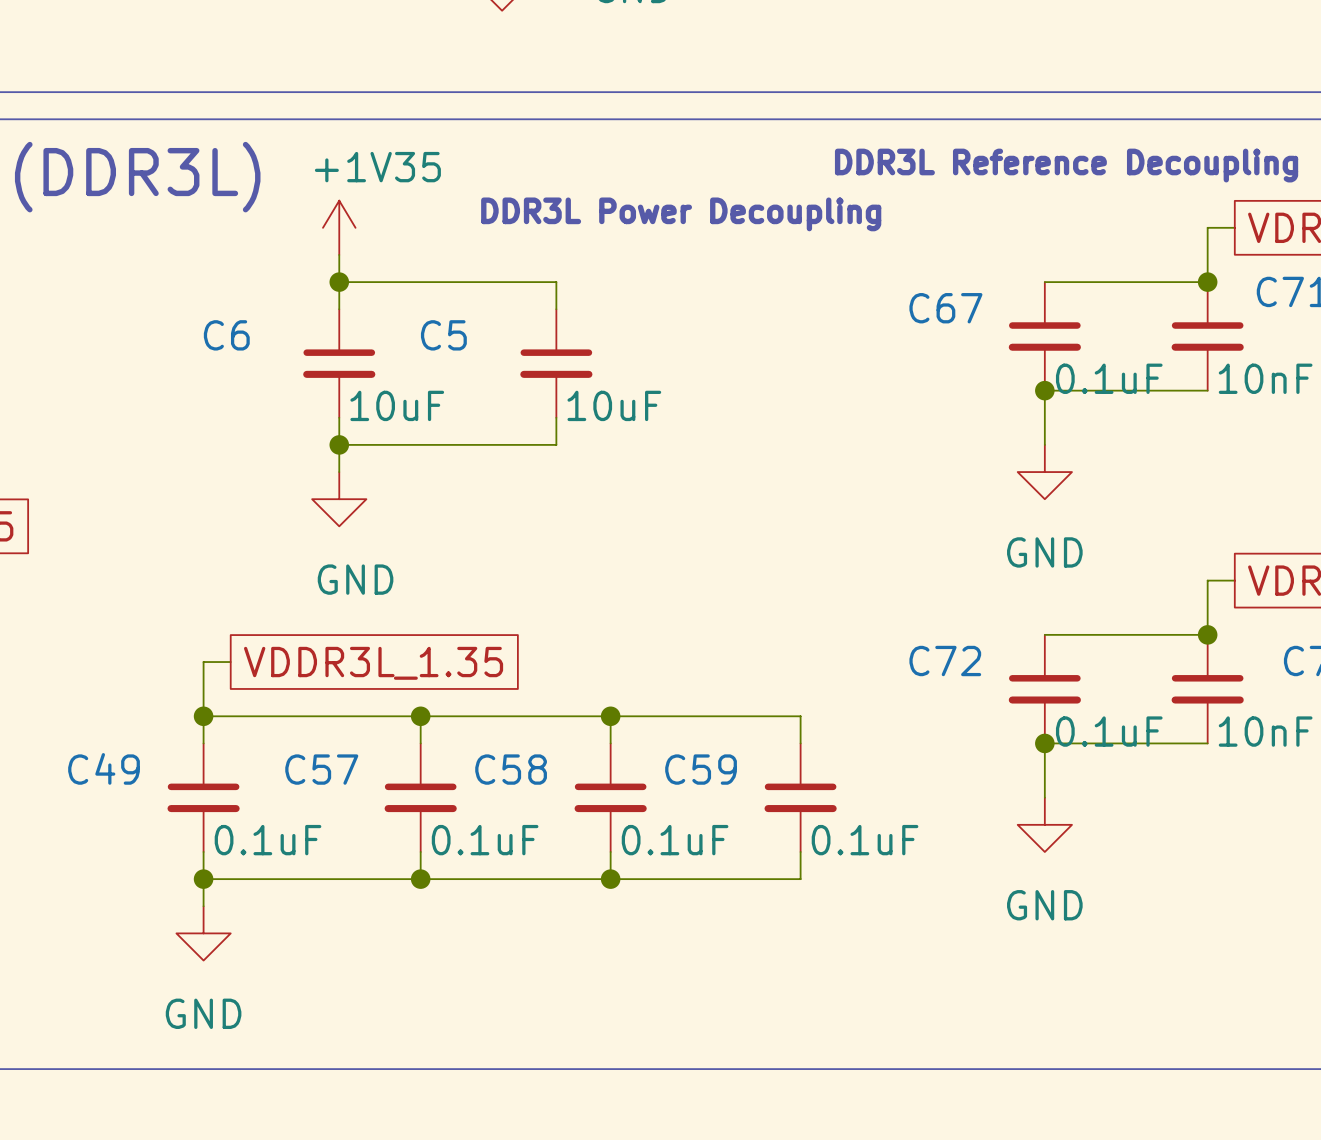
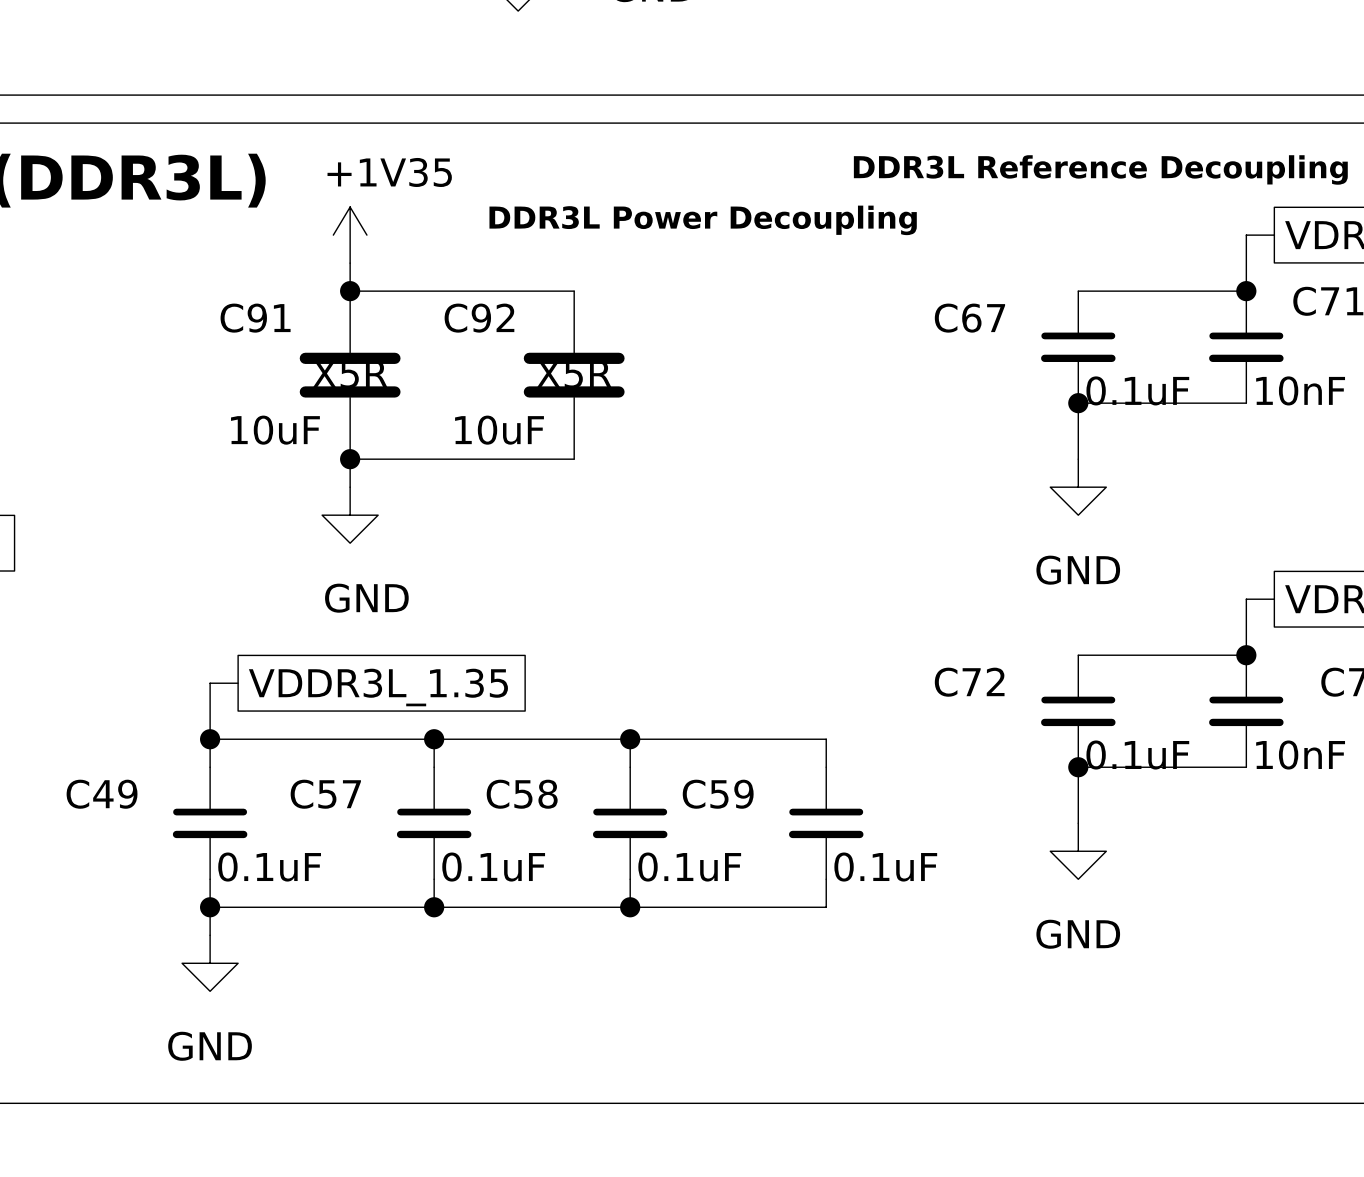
C6: 10uF (339, 363) -> none
C91: none -> 10uF (350, 375)
C5: 10uF (556, 363) -> none
C92: none -> 10uF (574, 375)

